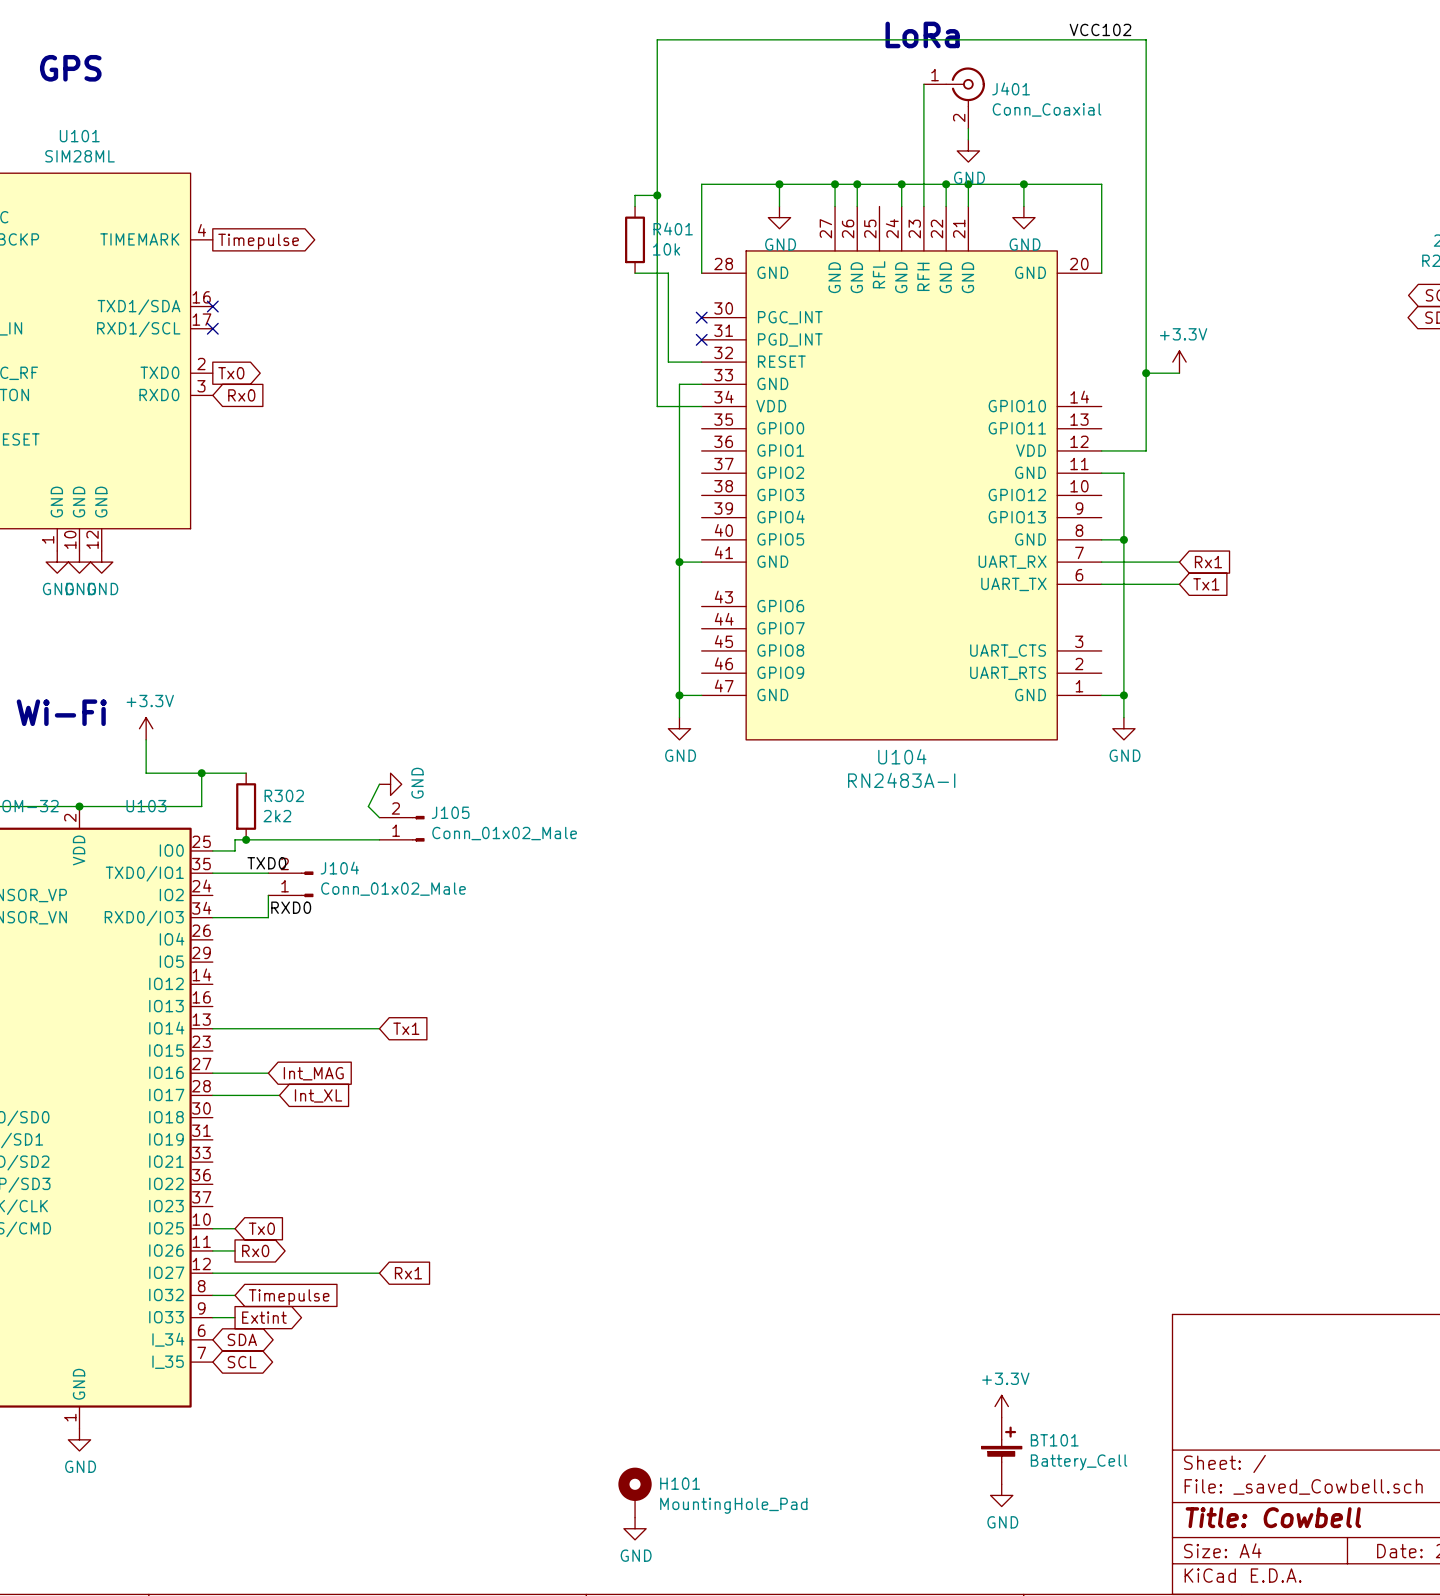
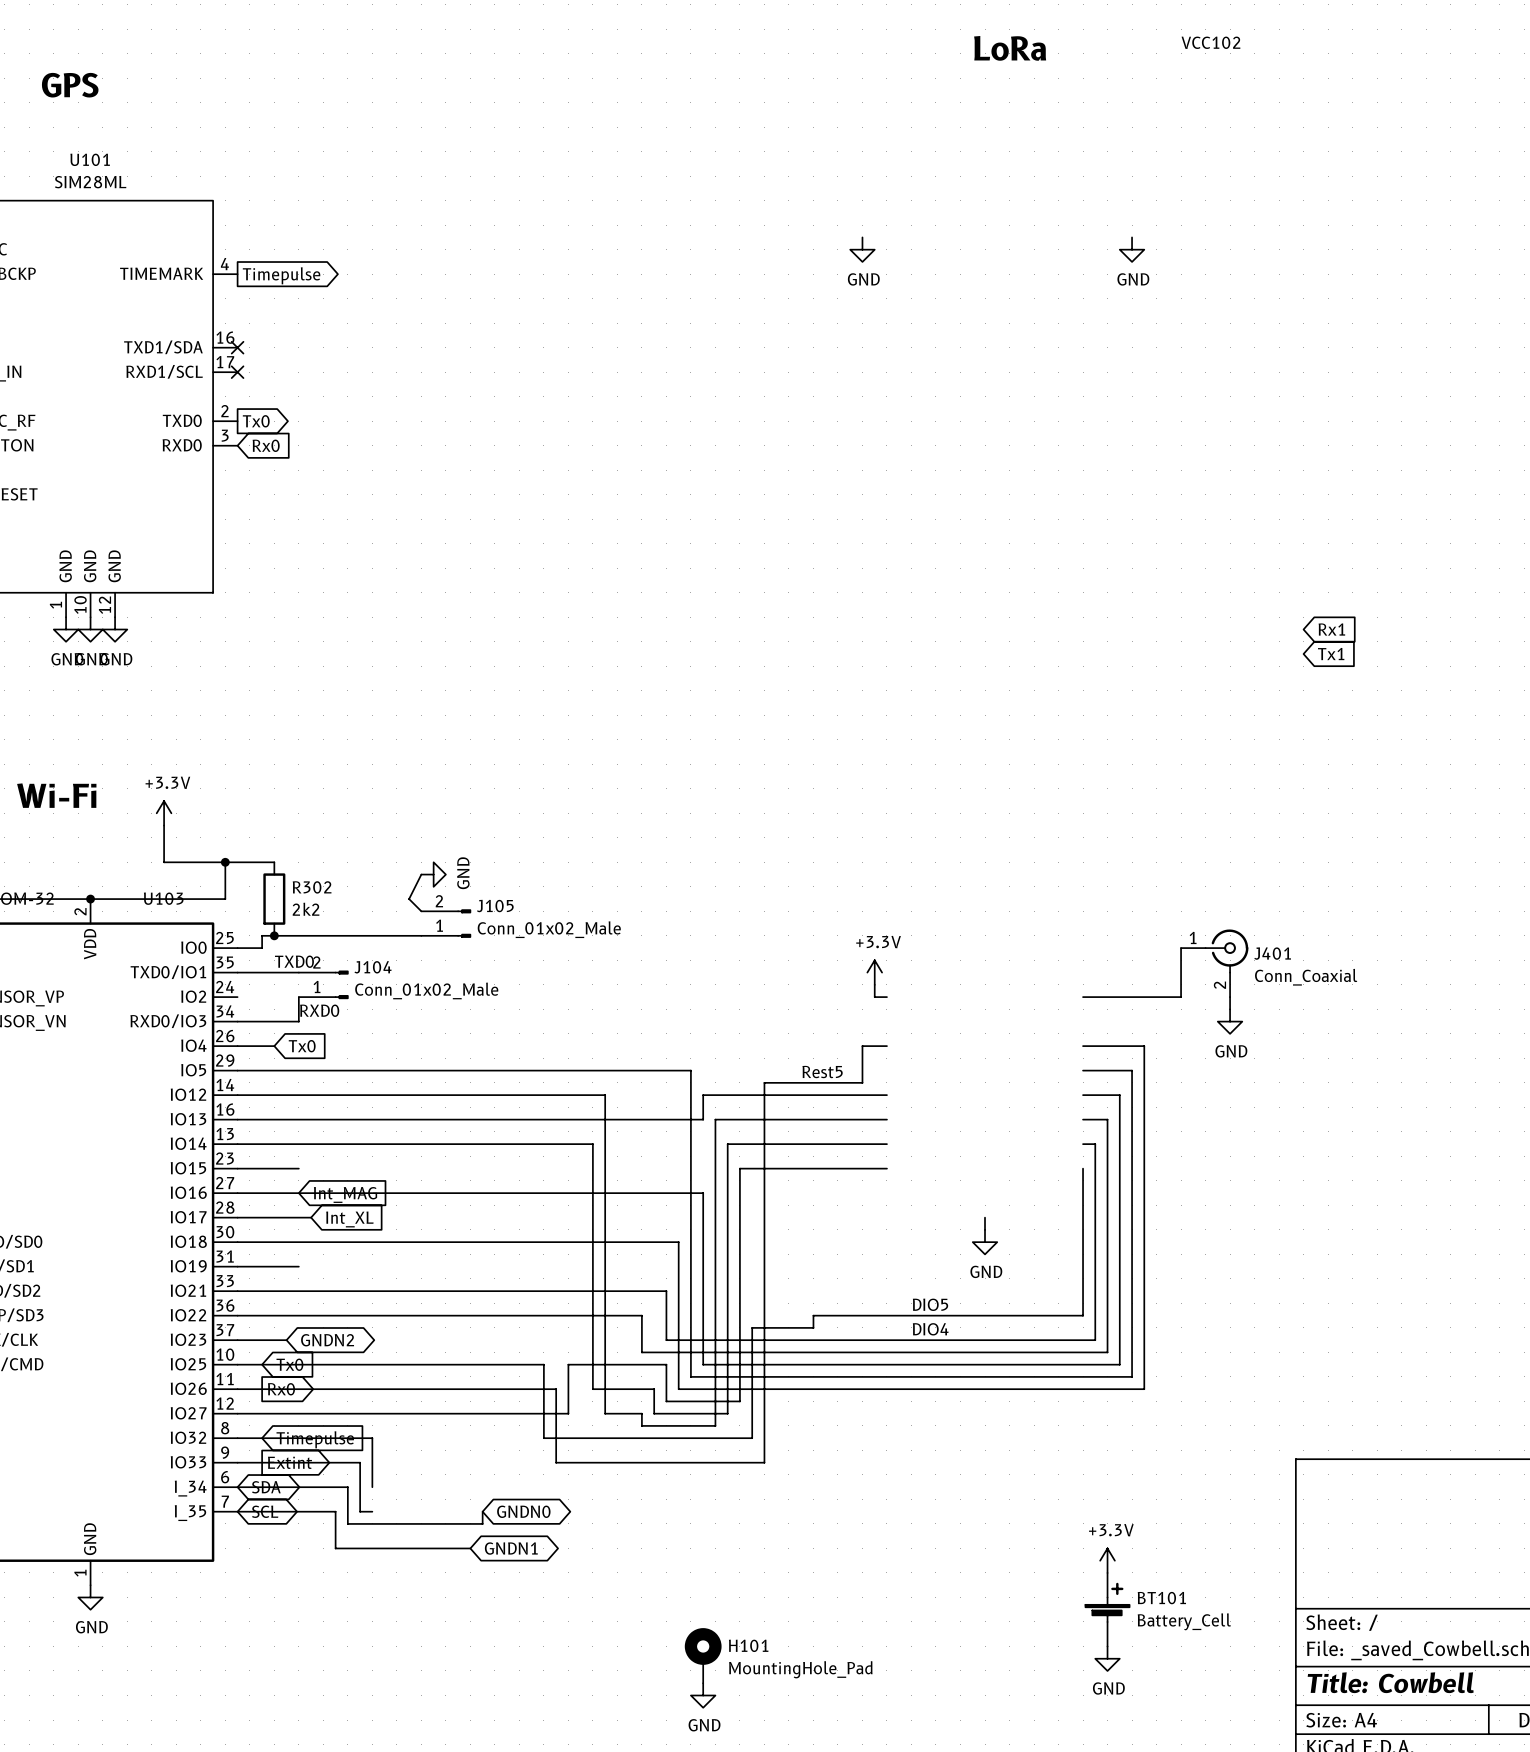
wire: (923, 84) (923, 206) -> none
J401 position: (954, 98) -> (1214, 963)
wire: (968, 128) (968, 139) -> none
power symbol: GND (968, 150) -> none
wire: (779, 184) (779, 206) -> none
junction: (779, 184) -> none
wire: (835, 184) (835, 206) -> none
junction: (835, 184) -> none
wire: (857, 184) (857, 206) -> none
junction: (857, 184) -> none
wire: (901, 184) (901, 206) -> none
junction: (901, 184) -> none
wire: (946, 184) (946, 206) -> none
junction: (946, 184) -> none
wire: (968, 184) (968, 206) -> none
junction: (968, 184) -> none
wire: (1023, 184) (1023, 206) -> none
junction: (1023, 184) -> none
wire: (657, 195) (635, 195) (635, 206) -> none
junction: (657, 195) -> none
R401: 10k (635, 239) -> none
wire: (635, 273) (668, 273) (668, 362) (701, 362) -> none
wire: (701, 273) (701, 184) (1101, 184) (1101, 273) -> none
no-connect mark: (701, 317) -> none
no-connect mark: (701, 339) -> none
power symbol: +3.3V (1179, 362) -> none
wire: (1146, 373) (1179, 373) -> none
junction: (1146, 373) -> none
wire: (701, 384) (679, 384) (679, 717) -> none
wire: (701, 406) (657, 406) (657, 39) (1146, 39) (1146, 450) (1101, 450) -> none
U104: RN2483A-I (901, 473) -> none
wire: (1101, 473) (1123, 473) (1123, 717) -> none
wire: (1101, 539) (1123, 539) -> none
junction: (1123, 539) -> none
wire: (679, 562) (701, 562) -> none
junction: (679, 562) -> none
wire: (1101, 562) (1179, 562) -> none
wire: (1101, 584) (1179, 584) -> none
wire: (679, 695) (701, 695) -> none
junction: (679, 695) -> none
wire: (1101, 695) (1123, 695) -> none
junction: (1123, 695) -> none
power symbol: GND (679, 728) -> none
power symbol position: GND (1123, 728) -> GND (1230, 1021)
wire: none -> (1181, 948) (1181, 997) (1083, 997)
power symbol: none -> +3.3V (874, 972)
wire: none -> (874, 984) (874, 997) (886, 997)
wire: none -> (1230, 997) (1230, 1009)
wire: none -> (237, 1046) (274, 1046)
global label: none -> Tx0 (302, 1046)
wire: none -> (886, 1046) (862, 1046) (862, 1082) (764, 1082) (764, 1462) (556, 1462) (556, 1389) (262, 1389)
wire: none -> (1083, 1046) (1144, 1046) (1144, 1389) (678, 1389) (678, 1242) (237, 1242)
wire: none -> (237, 1070) (690, 1070) (690, 1376) (1132, 1376) (1132, 1070) (1083, 1070)
label: none -> Rest5 (822, 1072)
wire: none -> (237, 1095) (605, 1095) (605, 1413) (641, 1413) (641, 1425) (715, 1425) (715, 1119) (886, 1119)
wire: none -> (886, 1095) (703, 1095) (703, 1119) (237, 1119)
wire: none -> (1083, 1095) (1119, 1095) (1119, 1364) (703, 1364) (703, 1193) (298, 1193)
wire: none -> (1083, 1119) (1107, 1119) (1107, 1352) (641, 1352) (641, 1315) (237, 1315)
wire: none -> (421, 1144) (592, 1144) (592, 1389) (654, 1389) (654, 1413) (727, 1413) (727, 1144) (886, 1144)
global label: Tx1 (406, 1028) -> none
wire: none -> (1083, 1144) (1095, 1144) (1095, 1340) (666, 1340) (666, 1291) (237, 1291)
wire: none -> (237, 1168) (298, 1168)
wire: none -> (886, 1168) (739, 1168) (739, 1401) (666, 1401) (666, 1364) (568, 1364) (568, 1413) (421, 1413)
wire: none -> (1083, 1168) (1083, 1315) (813, 1315) (813, 1327) (752, 1327) (752, 1438) (543, 1438) (543, 1364) (262, 1364)
wire: none -> (985, 1217) (985, 1229)
power symbol: none -> GND (985, 1242)
wire: none -> (237, 1266) (298, 1266)
label: none -> DIO5 (930, 1304)
label: none -> DIO4 (930, 1329)
wire: none -> (237, 1340) (286, 1340)
global label: none -> GNDN2 (327, 1340)
global label: Rx1 (408, 1273) -> none
wire: none -> (262, 1438) (372, 1438) (372, 1487)
wire: none -> (262, 1462) (360, 1462) (360, 1511) (372, 1511)
wire: none -> (237, 1487) (347, 1487) (347, 1523) (482, 1523) (482, 1511)
wire: none -> (237, 1511) (335, 1511) (335, 1548) (470, 1548)
global label: none -> GNDN0 (523, 1511)
global label: none -> GNDN1 (511, 1548)

